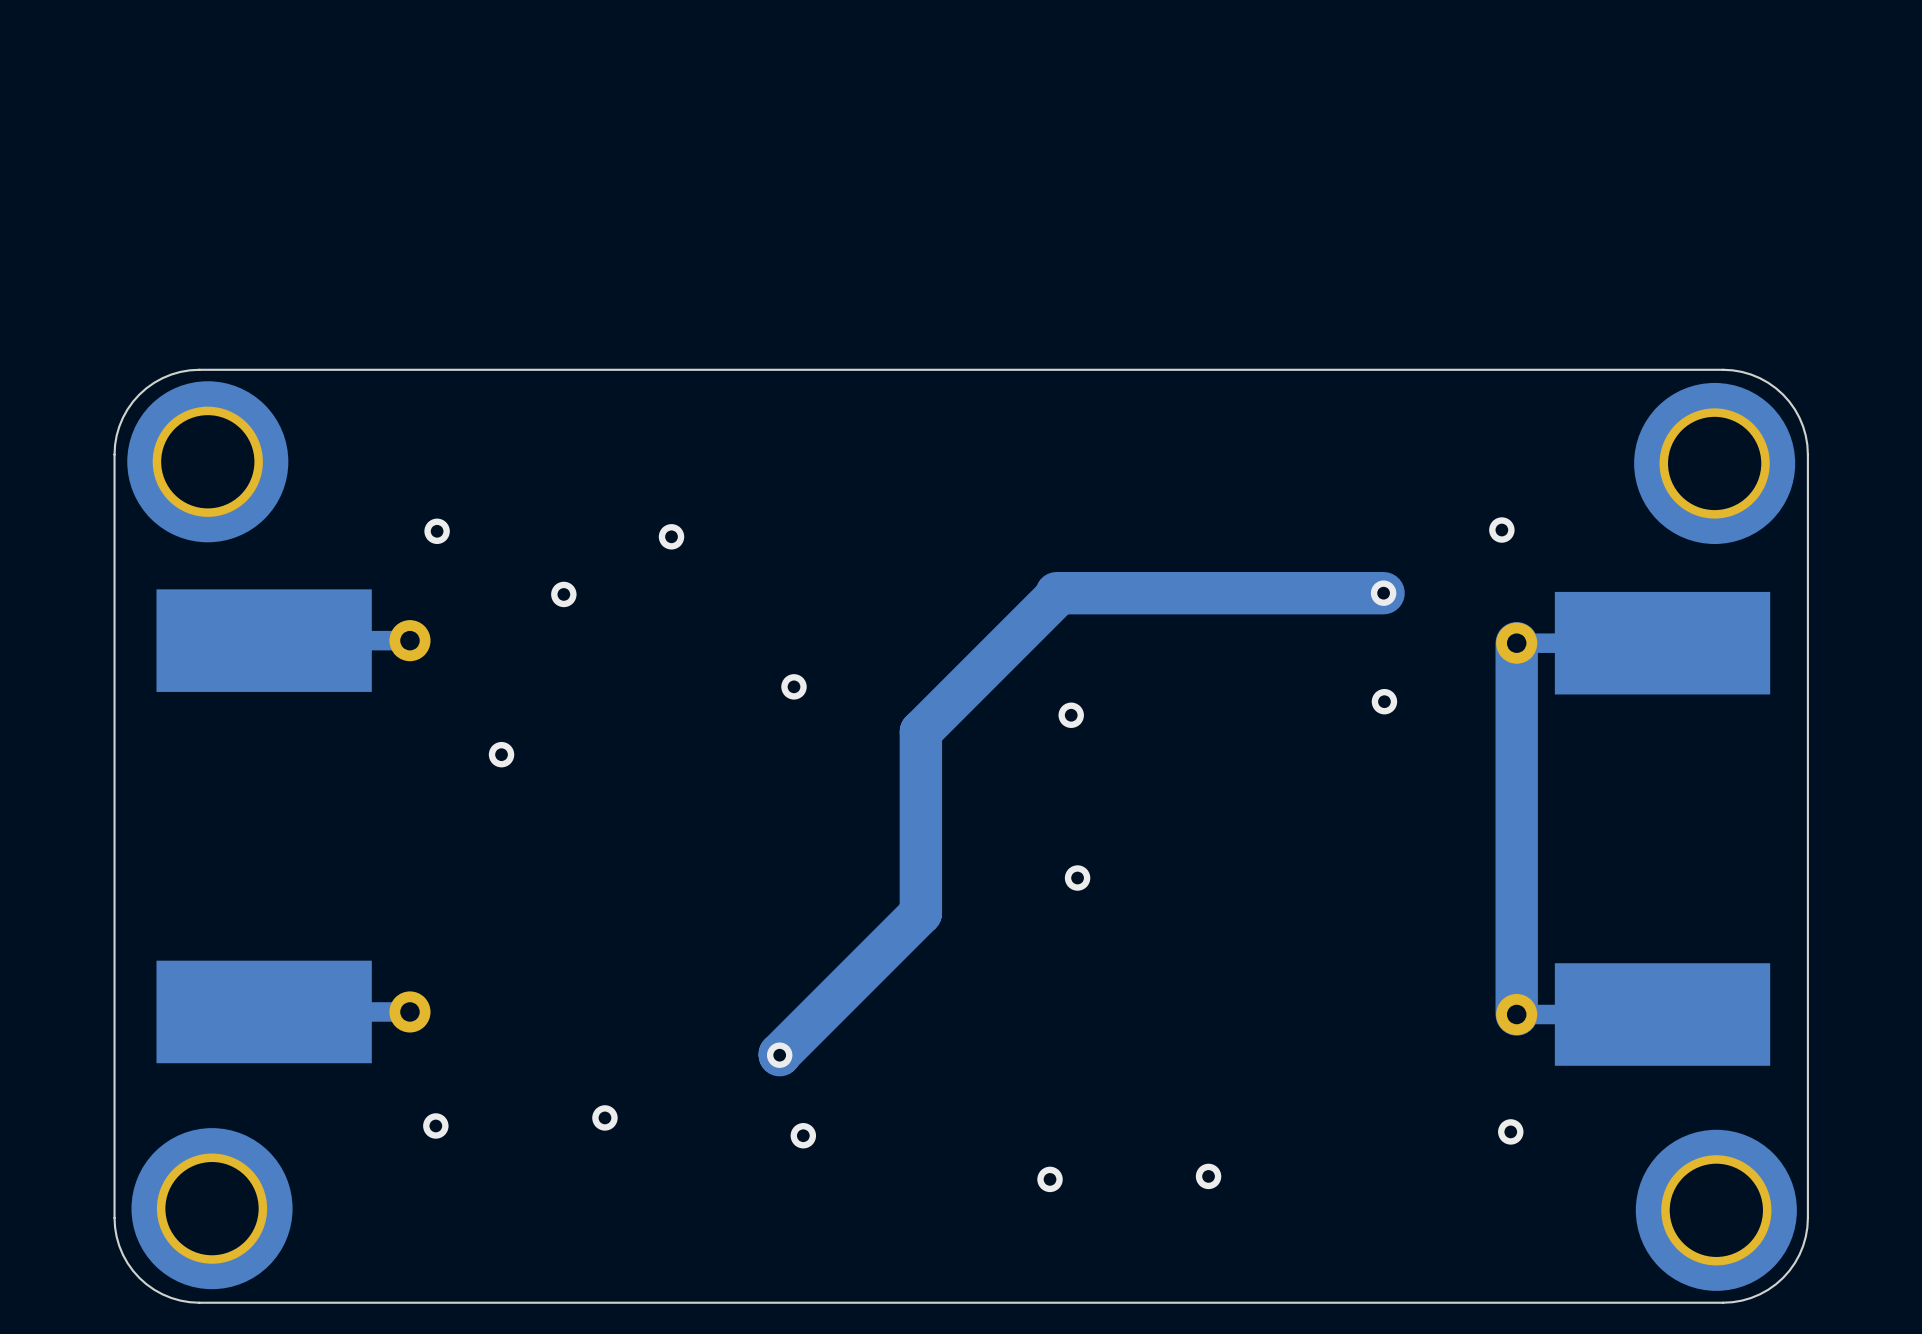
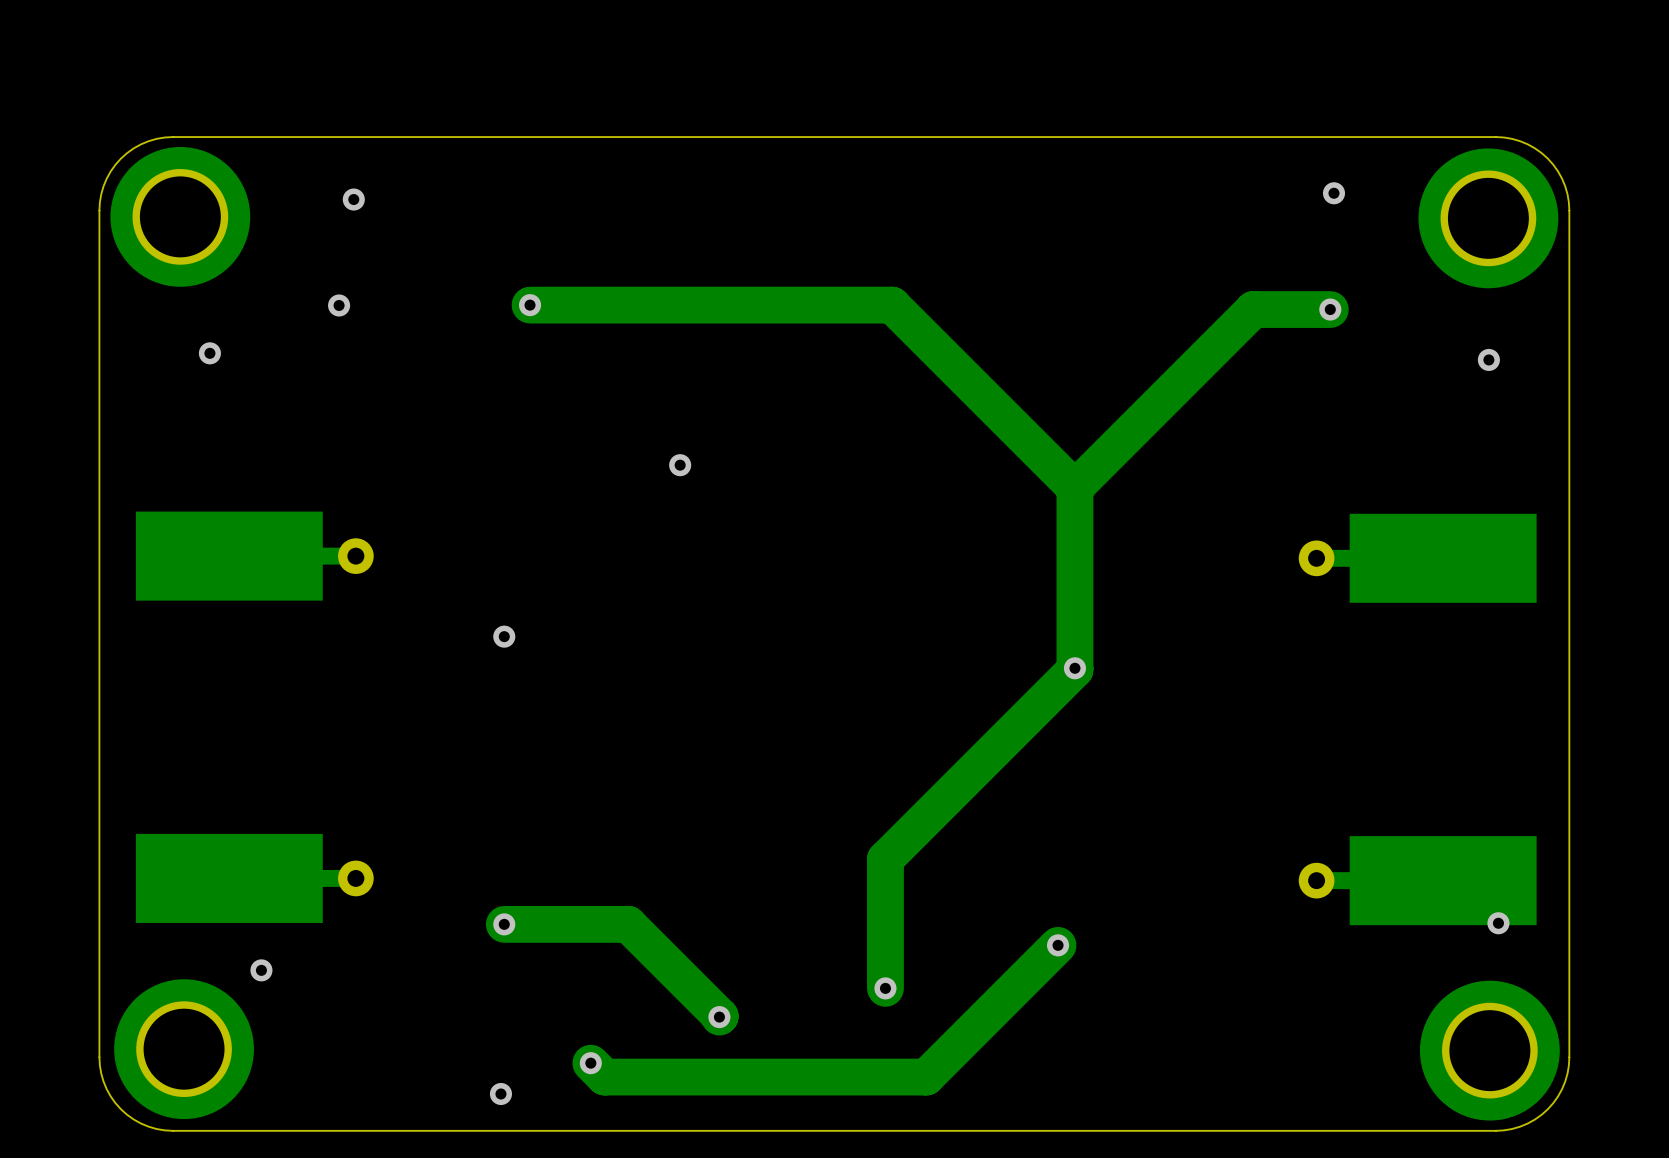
via: none -> (1333, 193)
via: none -> (353, 199)
via: none -> (339, 305)
track: none -> (530, 305) (892, 305) (1074, 487)
via: none -> (530, 305)
track: none -> (1330, 309) (1253, 309) (1074, 487)
via: none -> (1330, 309)
via: none -> (209, 353)
via: none -> (1488, 359)
board edge: (1807, 454) (1803, 426) (1794, 409) (1783, 394) (1759, 378) (1741, 371) (1723, 369) (199, 369) (180, 371) (162, 378) (139, 394) (127, 409) (119, 426) (114, 454) -> (1569, 394) (1569, 210) (1567, 194) (1558, 171) (1541, 153) (1520, 141) (1495, 137) (173, 137) (156, 138) (141, 144) (120, 158) (110, 171) (101, 194) (99, 210) (99, 394)
part position: (207, 461) -> (180, 216)
part position: (1714, 463) -> (1488, 218)
via: (1501, 530) -> none
via: (437, 531) -> none
via: none -> (680, 465)
via: (671, 536) -> none
track: none -> (1074, 487) (1074, 669) (885, 859) (885, 988)
track: (1383, 593) (1056, 593) -> none
via: (1383, 593) -> none
via: (563, 594) -> none
track: (1054, 597) (920, 731) (920, 913) (779, 1055) -> none
track: (1516, 643) (1516, 1014) -> none
via: (794, 686) -> none
via: (1384, 701) -> none
via: (1071, 715) -> none
via: none -> (504, 636)
via: (501, 754) -> none
via: none -> (1074, 668)
via: (1077, 878) -> none
via: (779, 1055) -> none
via: none -> (1498, 923)
track: none -> (504, 924) (628, 924) (719, 1017)
track: none -> (1058, 945) (926, 1077) (604, 1077) (590, 1063)
via: none -> (261, 970)
via position: (604, 1117) -> (504, 924)
via: (435, 1125) -> none
via: (1510, 1131) -> none
via position: (803, 1135) -> (719, 1017)
via position: (1208, 1176) -> (1058, 945)
via position: (1050, 1179) -> (885, 988)
via: none -> (590, 1063)
via: none -> (500, 1093)

